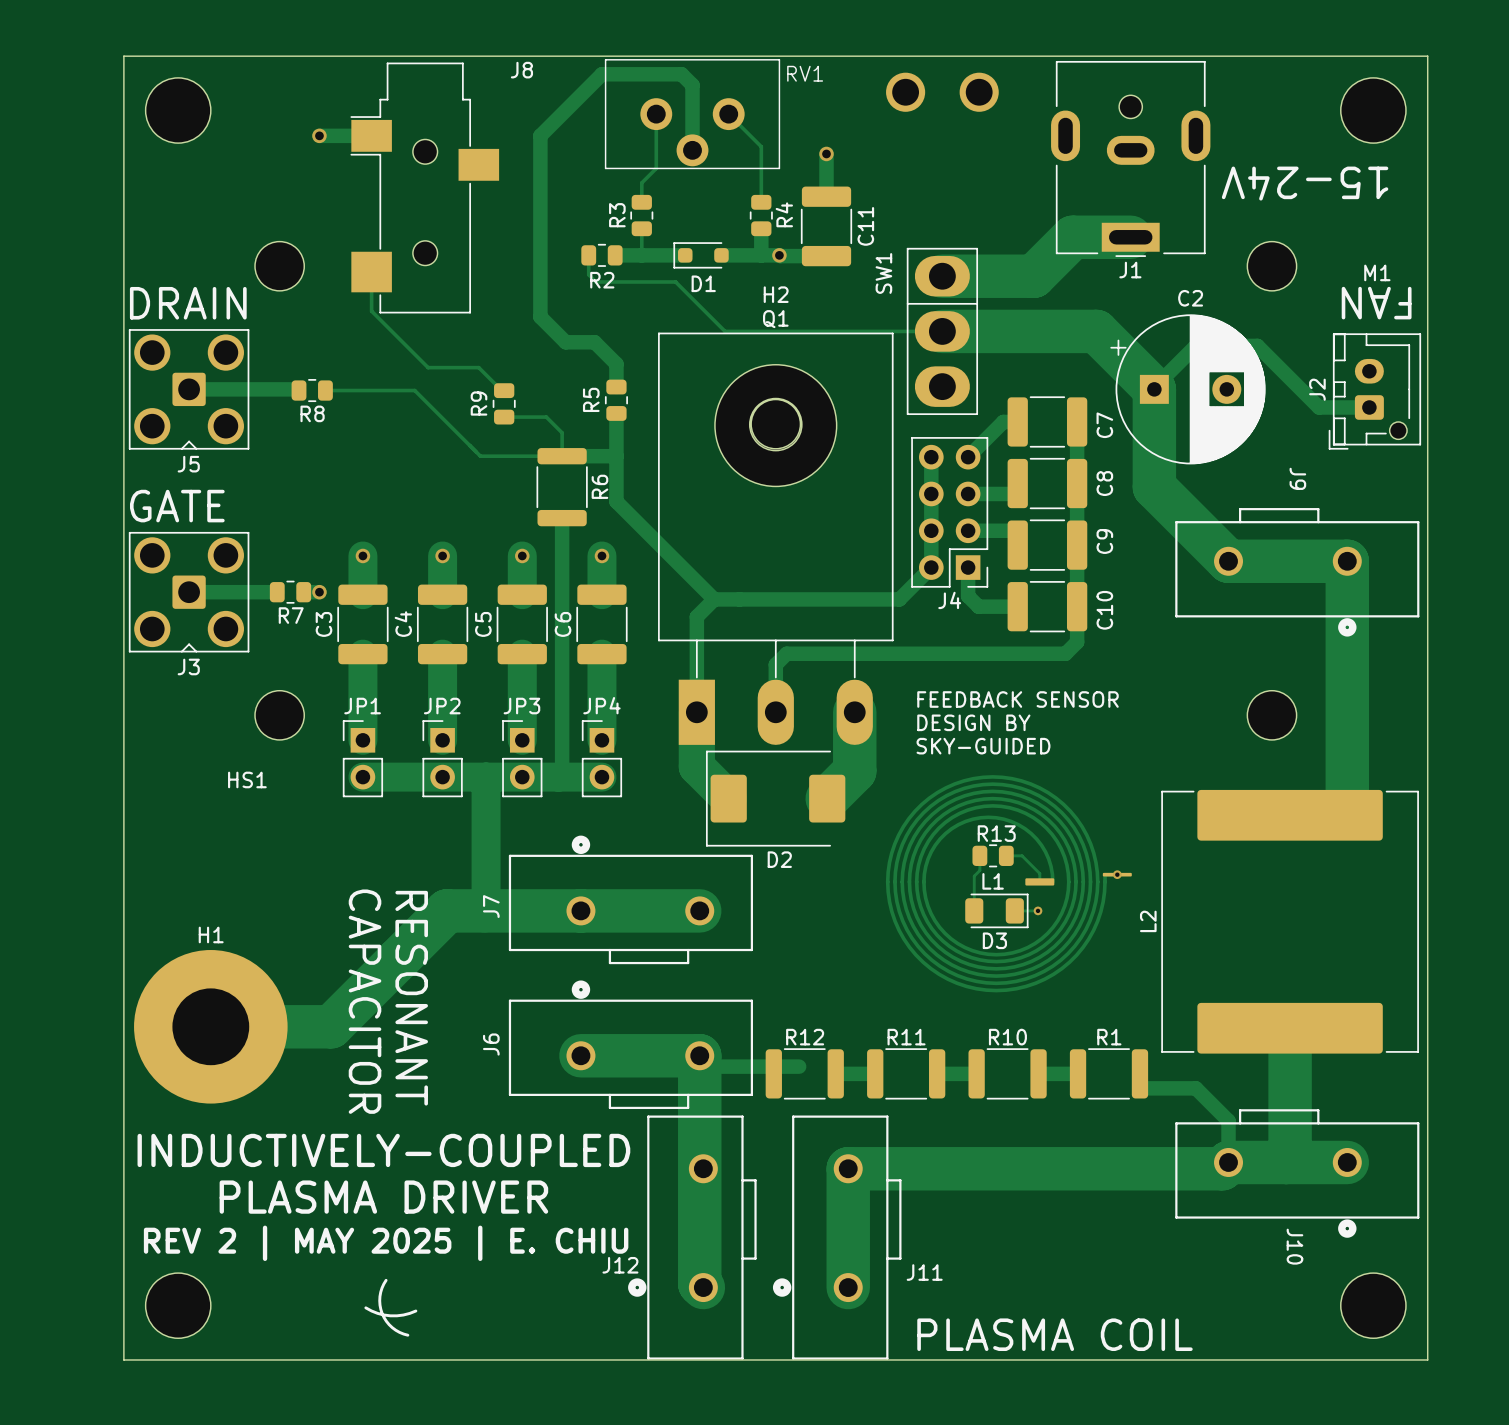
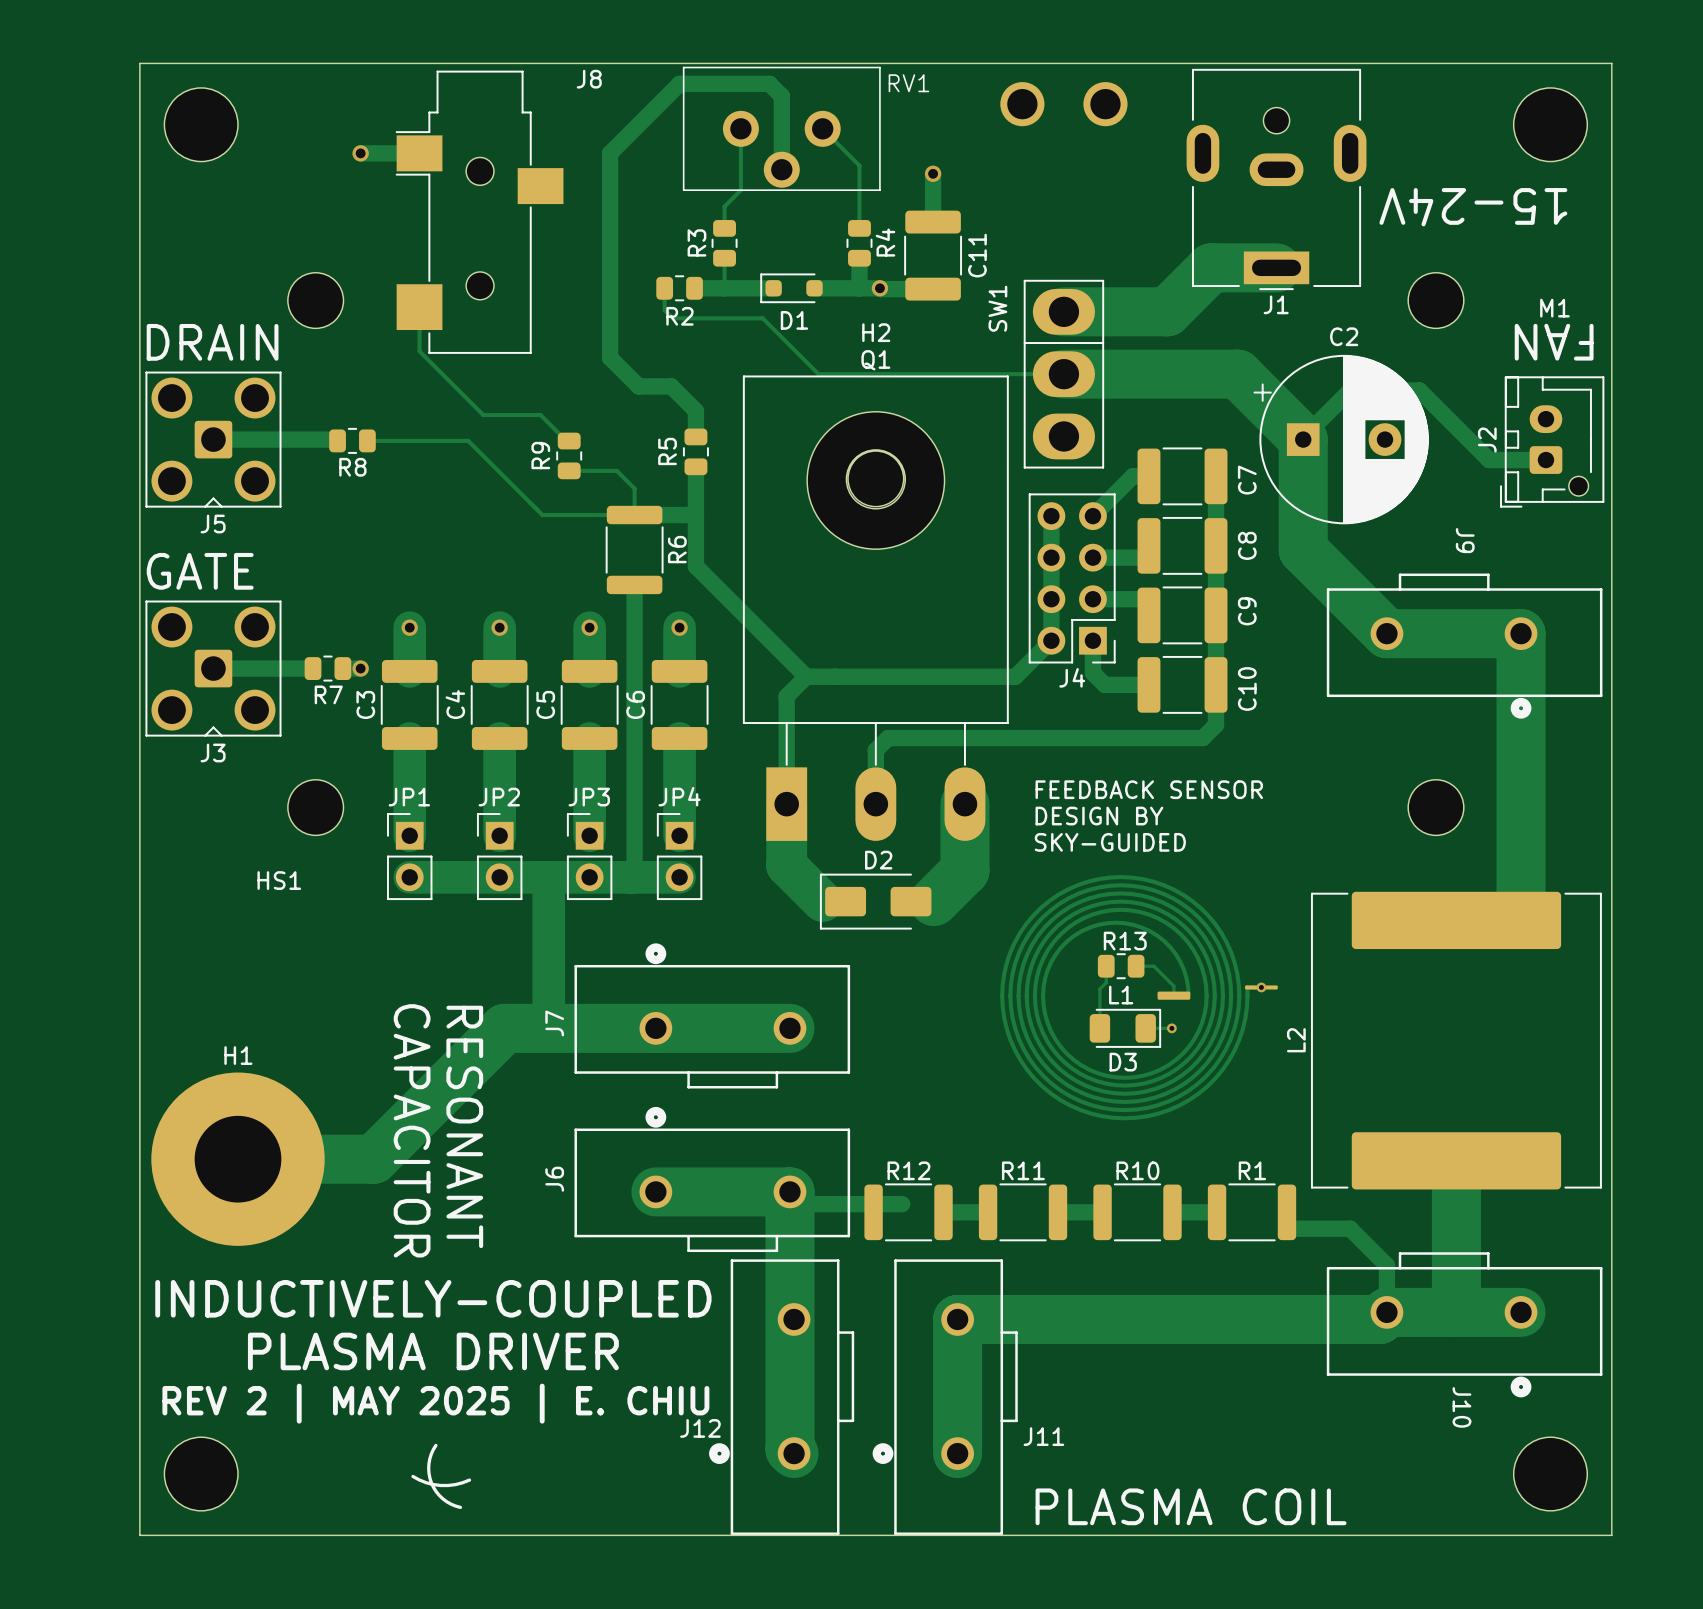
D2 footprint: [705, 750, 846, 847] -> [819, 873, 932, 930]
D2 name position: D2 (779, 859) -> D2 (878, 860)

